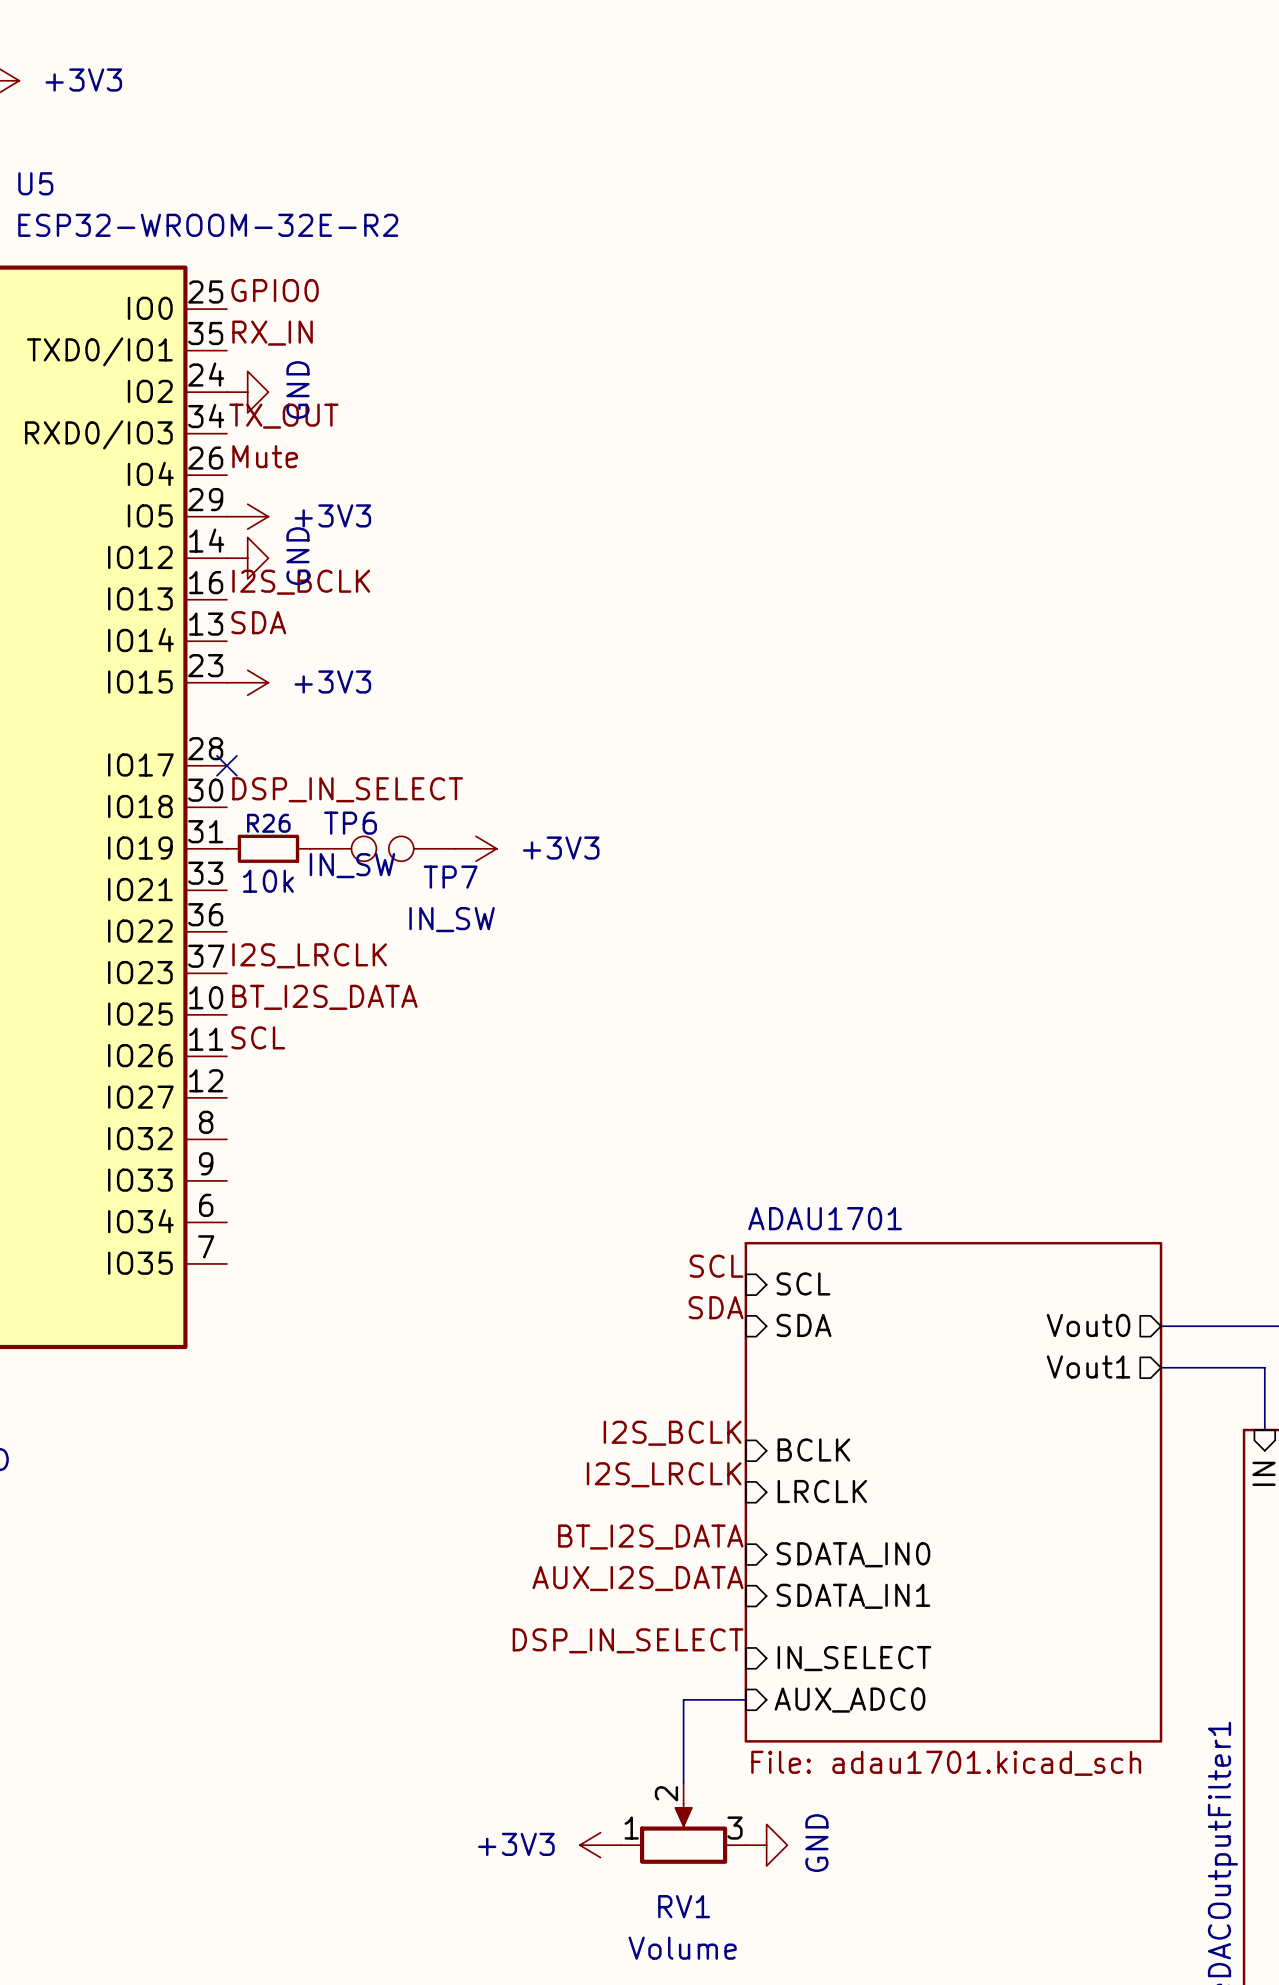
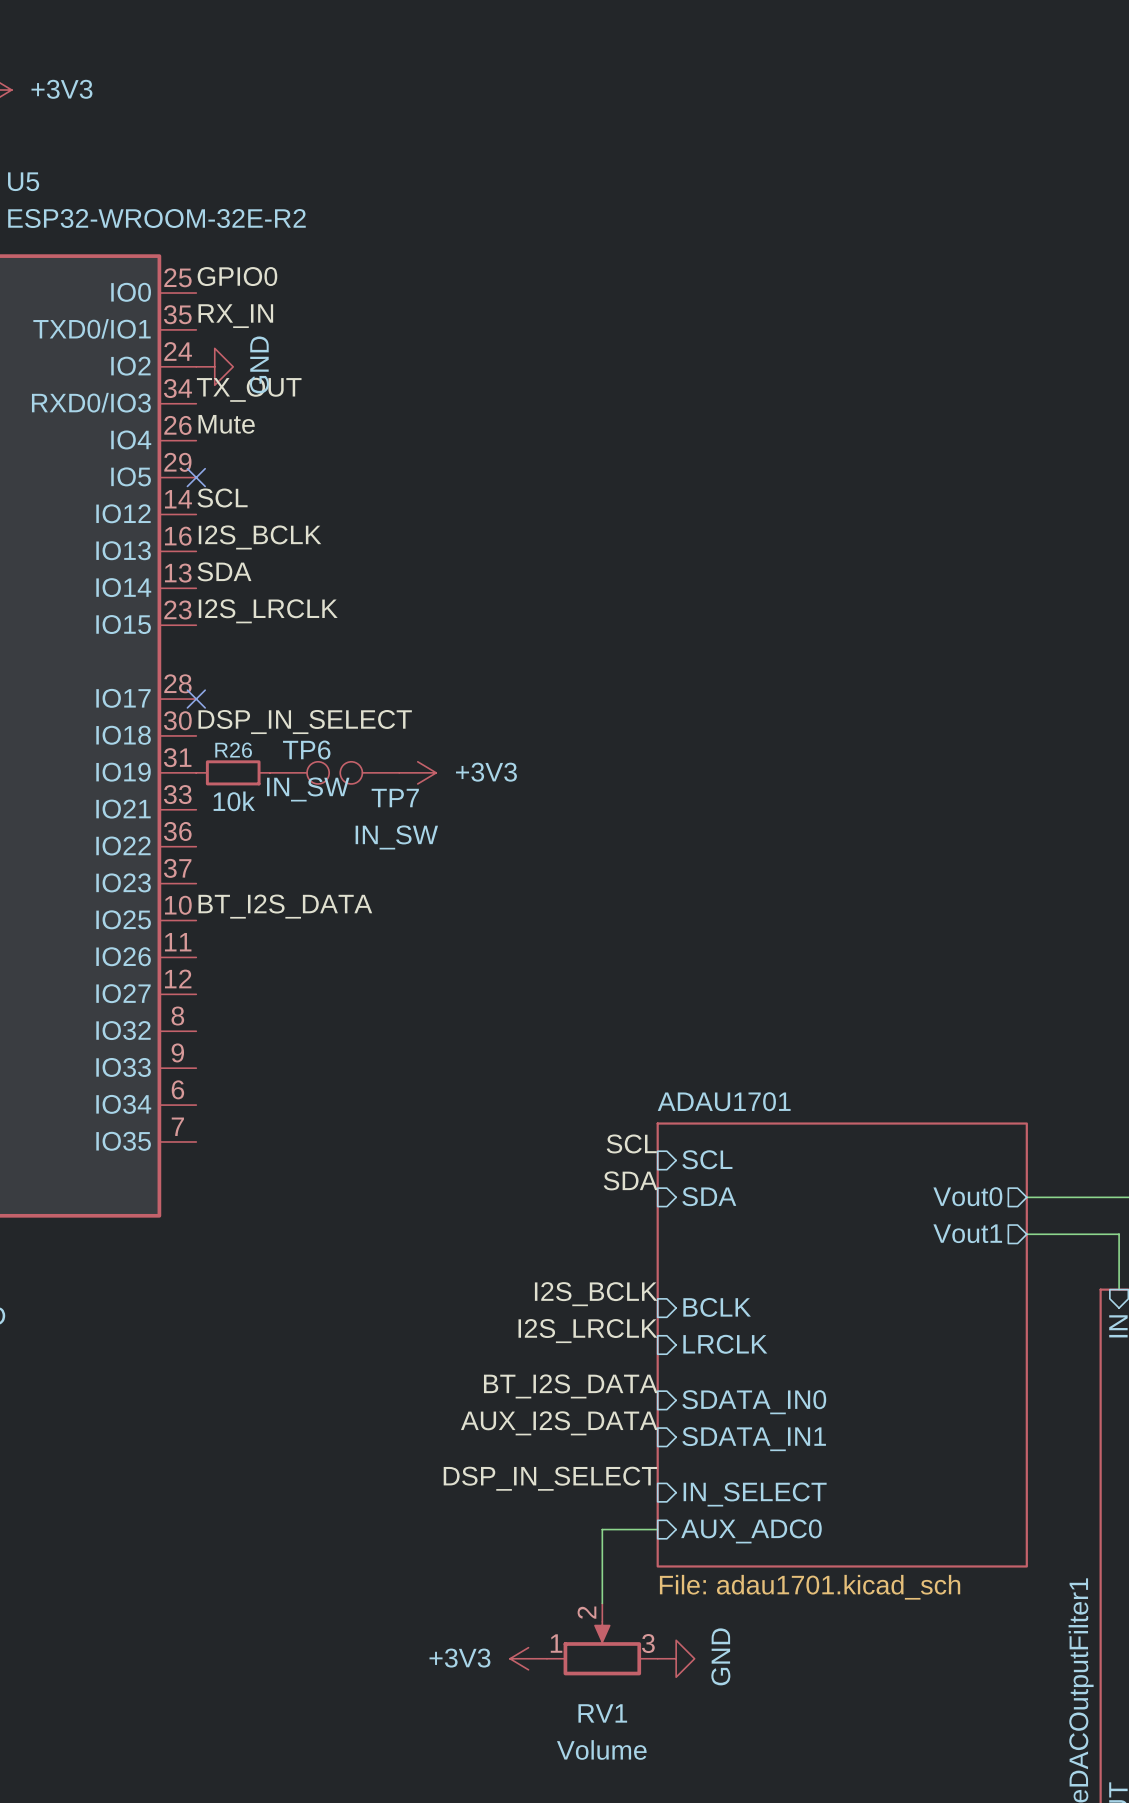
no-connect mark: none -> (196, 477)
power symbol: +3V3 (247, 516) -> none
label: none -> SCL (222, 498)
power symbol: GND (247, 558) -> none
power symbol: +3V3 (247, 682) -> none
label position: I2S_LRCLK (309, 955) -> I2S_LRCLK (268, 611)
label: SCL (258, 1037) -> none

